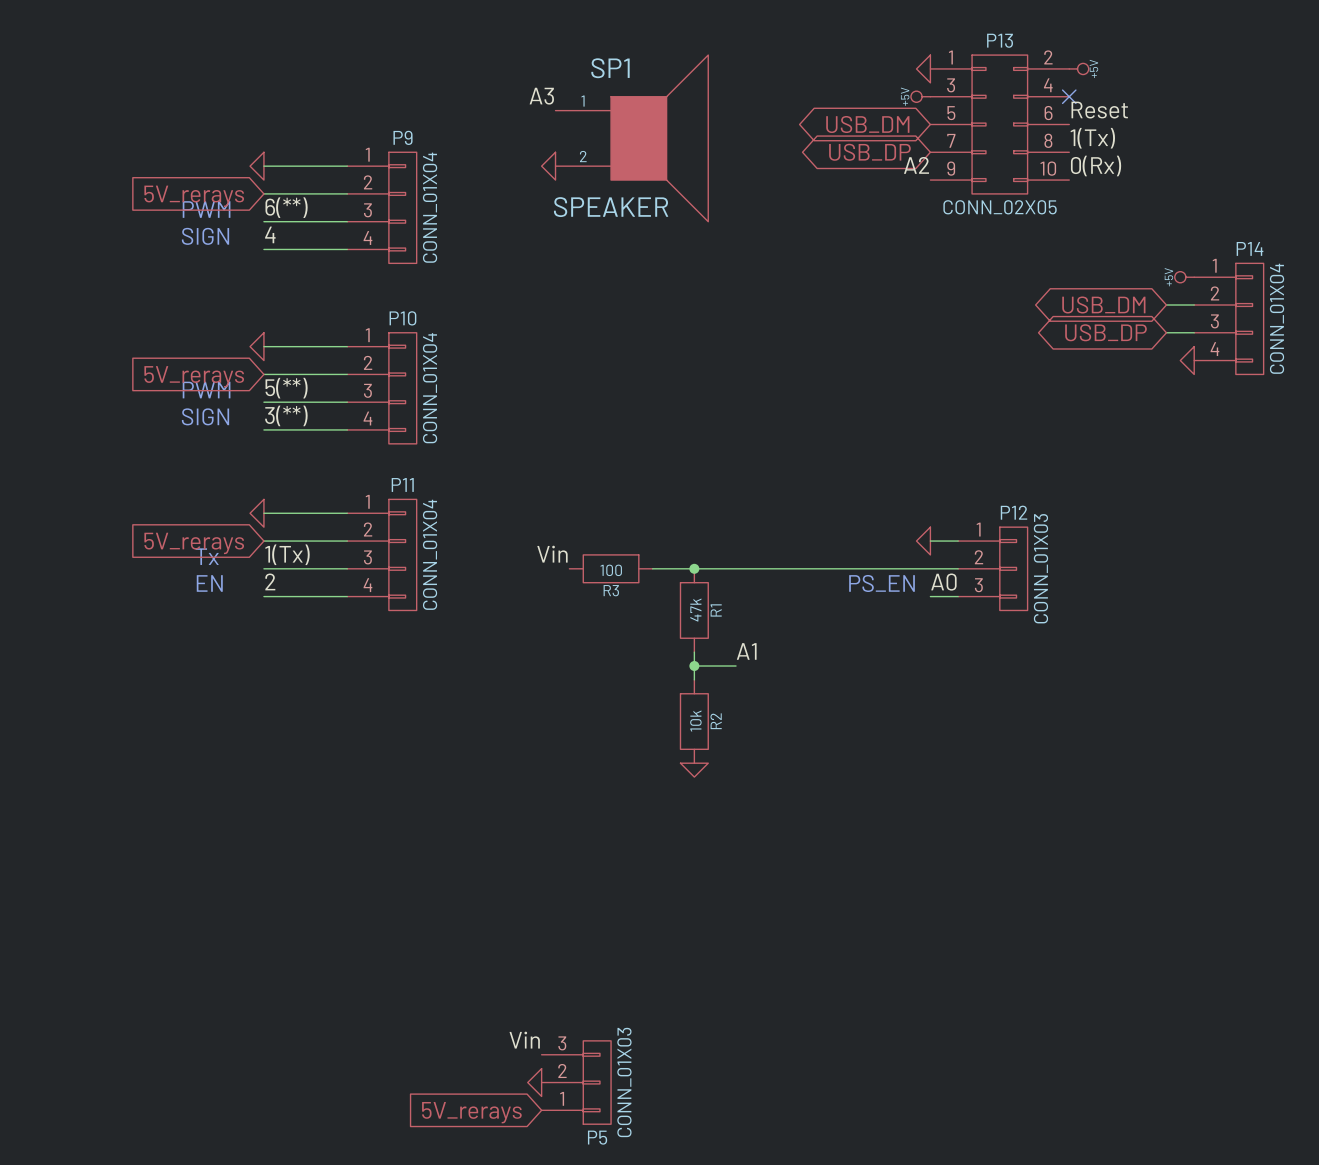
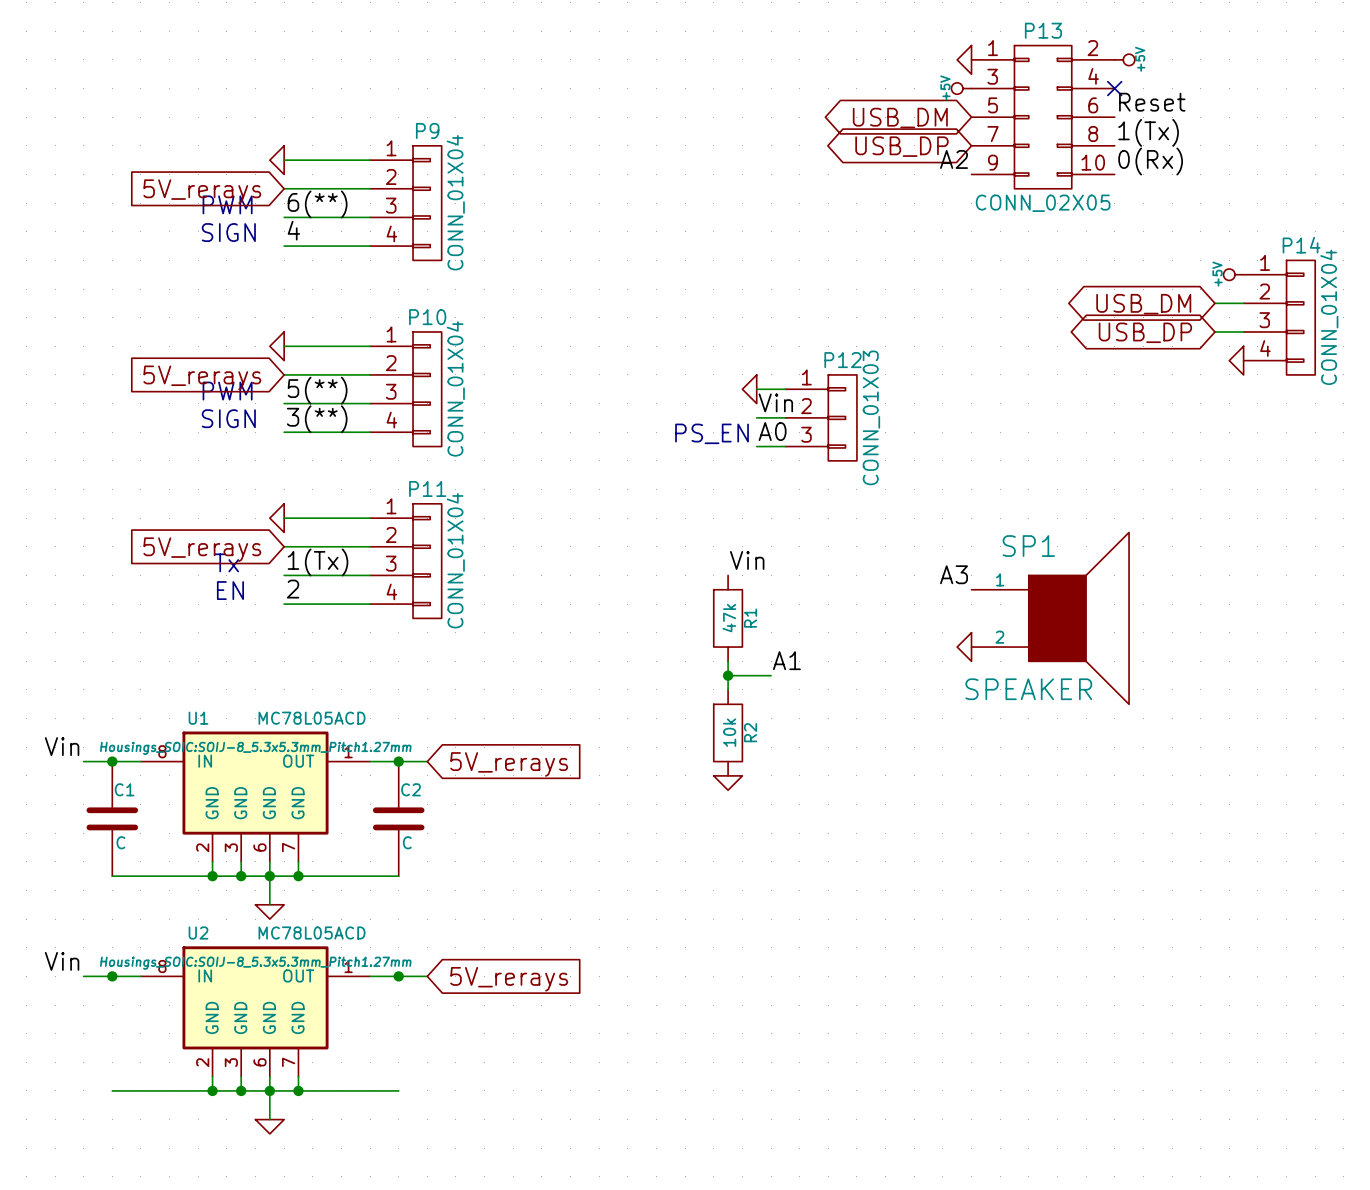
label: A3 (541, 96) -> none
SP1 position: (631, 138) -> (1050, 618)
power symbol: (548, 166) -> none
power symbol: none -> (749, 389)
label: none -> Vin (775, 402)
wire: none -> (756, 417) (785, 417)
power symbol position: (923, 541) -> (964, 647)
wire: (930, 541) (958, 541) -> (756, 389) (785, 389)
label: Vin (552, 554) -> none
label: none -> Vin (747, 560)
R3: 100 (611, 568) -> none
wire: (652, 568) (958, 568) -> none
junction: (694, 568) -> none
label: none -> A3 (954, 574)
P12 position: (992, 568) -> (821, 417)
label position: A0 (943, 582) -> A0 (772, 431)
text position: PS_EN (882, 583) -> PS_EN (712, 433)
wire: (930, 596) (958, 596) -> (756, 446) (785, 446)
label: none -> Vin (62, 746)
wire: none -> (83, 761) (140, 761)
junction: none -> (112, 761)
wire: none -> (370, 761) (427, 761)
junction: none -> (398, 761)
global label: none -> 5V_rerays (509, 764)
U1: none -> MC78L05ACD (255, 796)
C1: none -> C (112, 818)
C2: none -> C (398, 818)
wire: none -> (212, 861) (212, 876)
wire: none -> (241, 861) (241, 876)
wire: none -> (269, 861) (269, 904)
wire: none -> (298, 861) (298, 876)
wire: none -> (112, 876) (398, 876)
junction: none -> (212, 876)
junction: none -> (241, 876)
junction: none -> (269, 876)
junction: none -> (298, 876)
power symbol: none -> (269, 911)
label: none -> Vin (62, 961)
wire: none -> (83, 976) (140, 976)
junction: none -> (112, 976)
wire: none -> (370, 976) (427, 976)
junction: none -> (398, 976)
global label: none -> 5V_rerays (509, 979)
U2: none -> MC78L05ACD (255, 1011)
label: Vin (524, 1040) -> none
wire: none -> (212, 1076) (212, 1090)
wire: none -> (241, 1076) (241, 1090)
wire: none -> (269, 1076) (269, 1119)
wire: none -> (298, 1076) (298, 1090)
wire: none -> (112, 1090) (398, 1090)
junction: none -> (212, 1090)
junction: none -> (241, 1090)
junction: none -> (269, 1090)
junction: none -> (298, 1090)
power symbol: (534, 1082) -> none
P5: CONN_01X03 (576, 1082) -> none
power symbol: none -> (269, 1126)
global label: 5V_rerays (471, 1112) -> none

